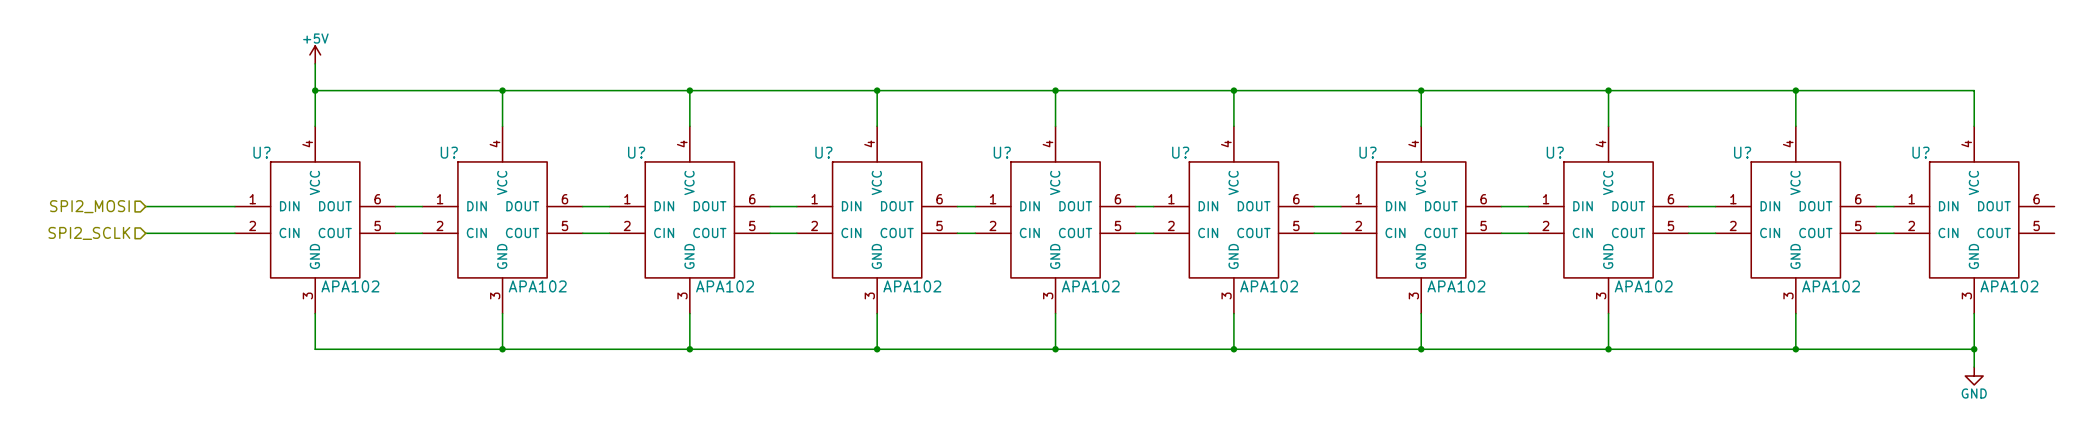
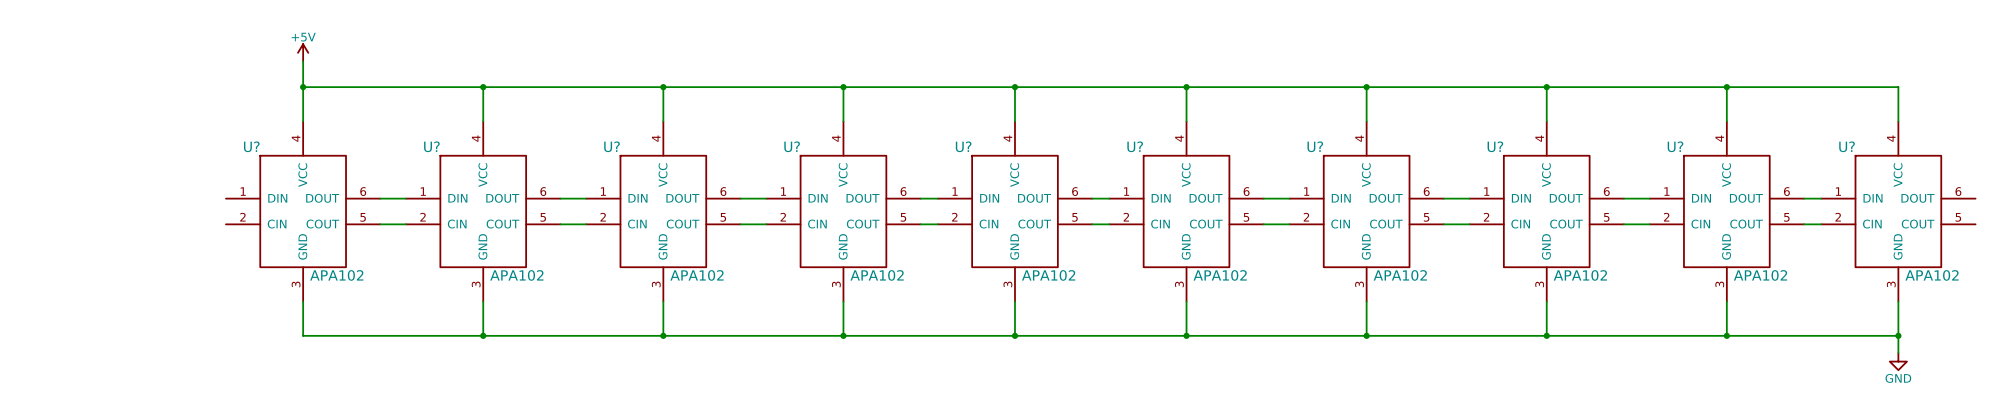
hierarchical label: SPI2_MOSI (89, 206) -> none
wire: (145, 206) (234, 206) -> none
hierarchical label: SPI2_SCLK (89, 233) -> none
wire: (145, 233) (234, 233) -> none

